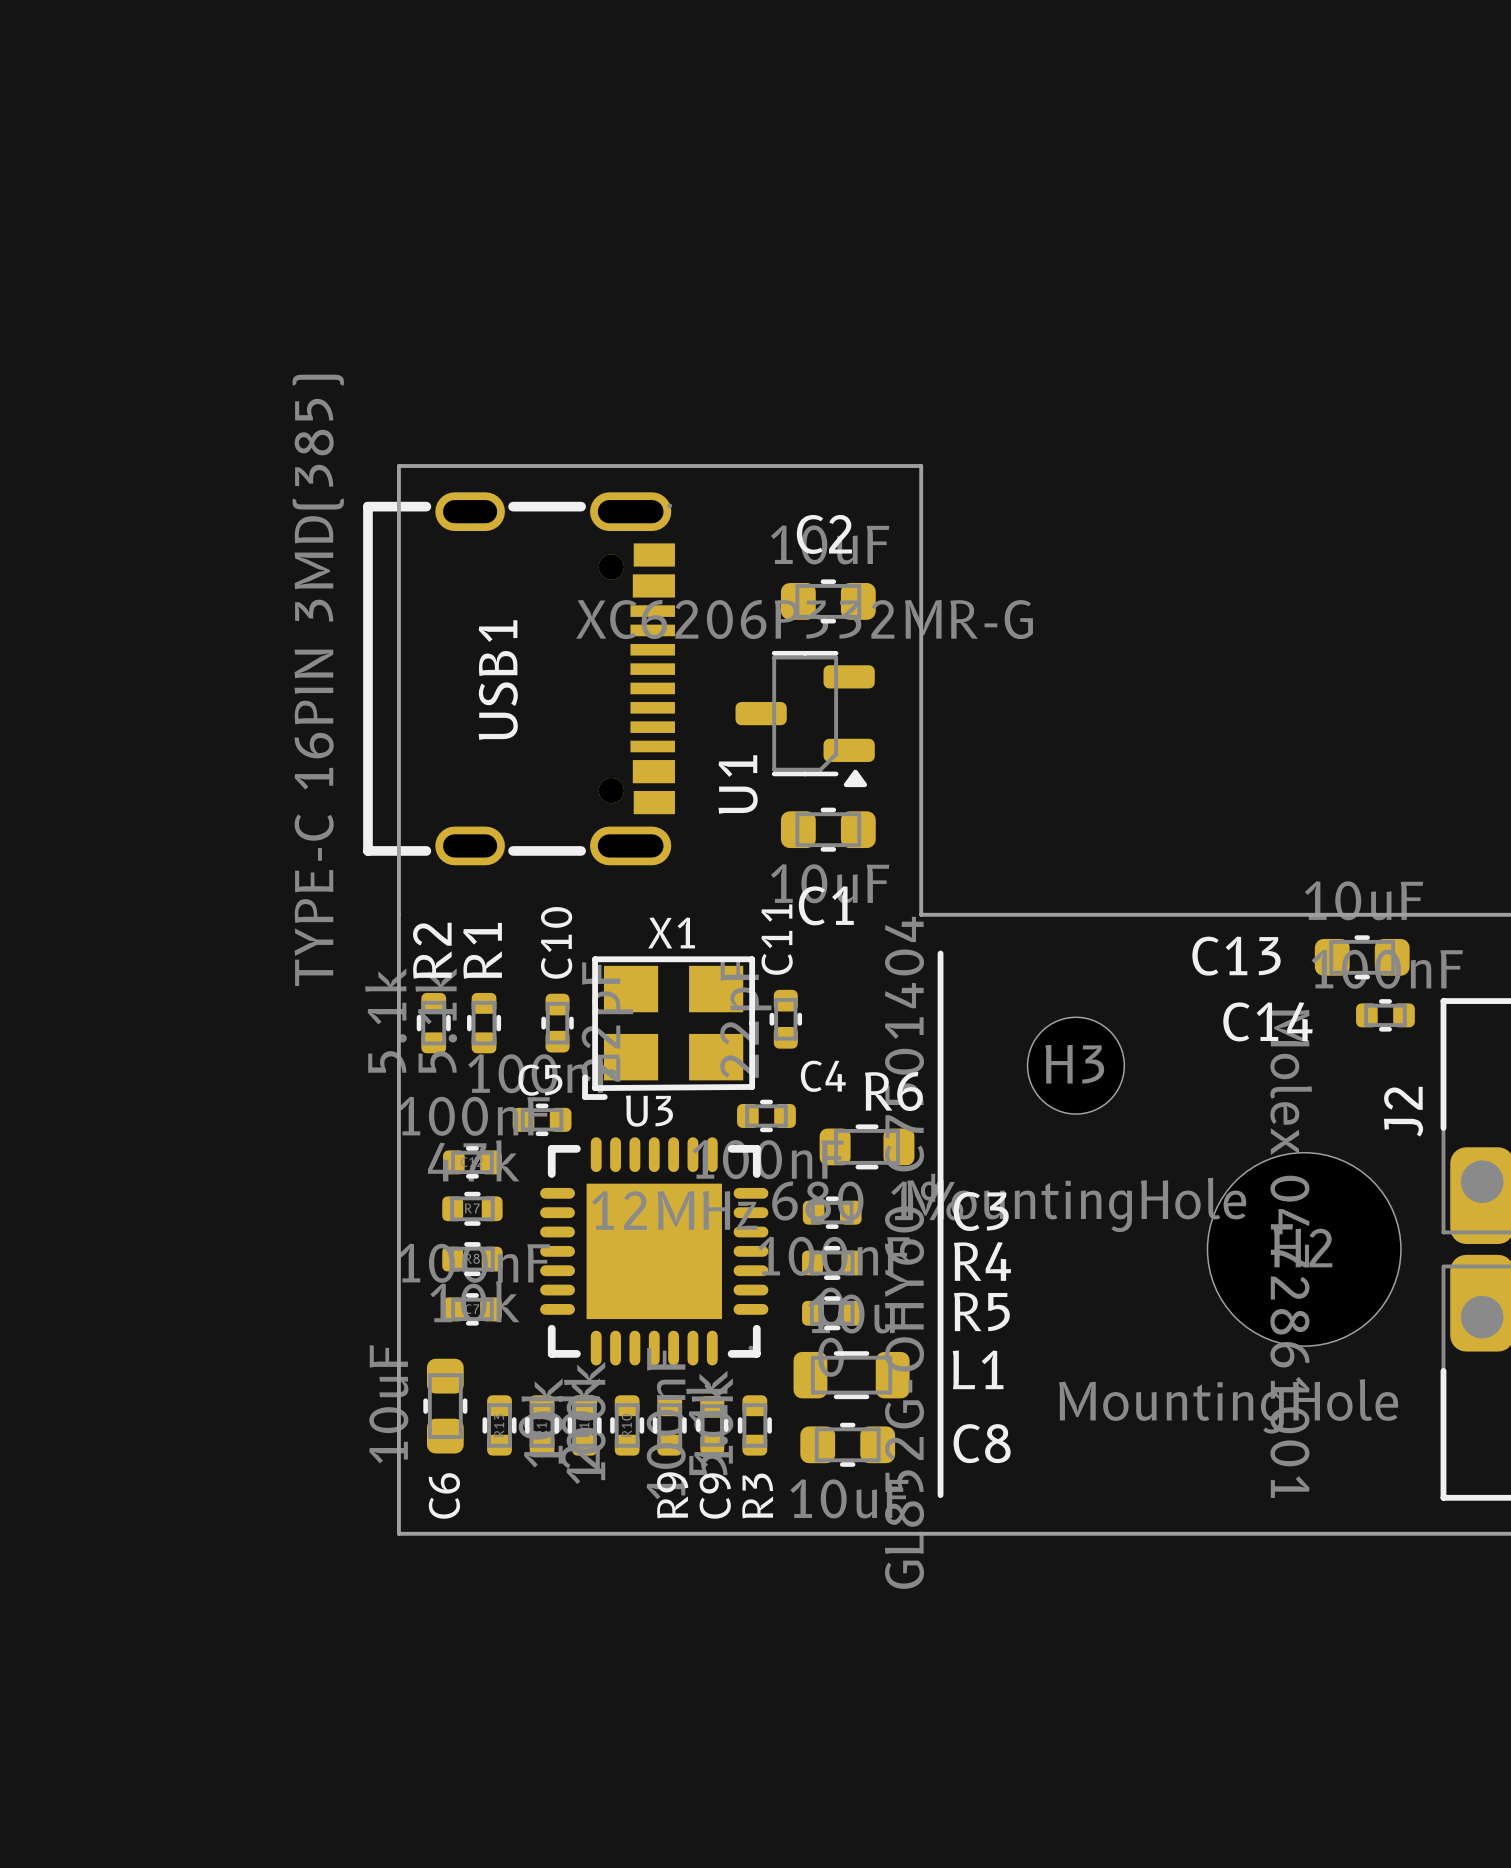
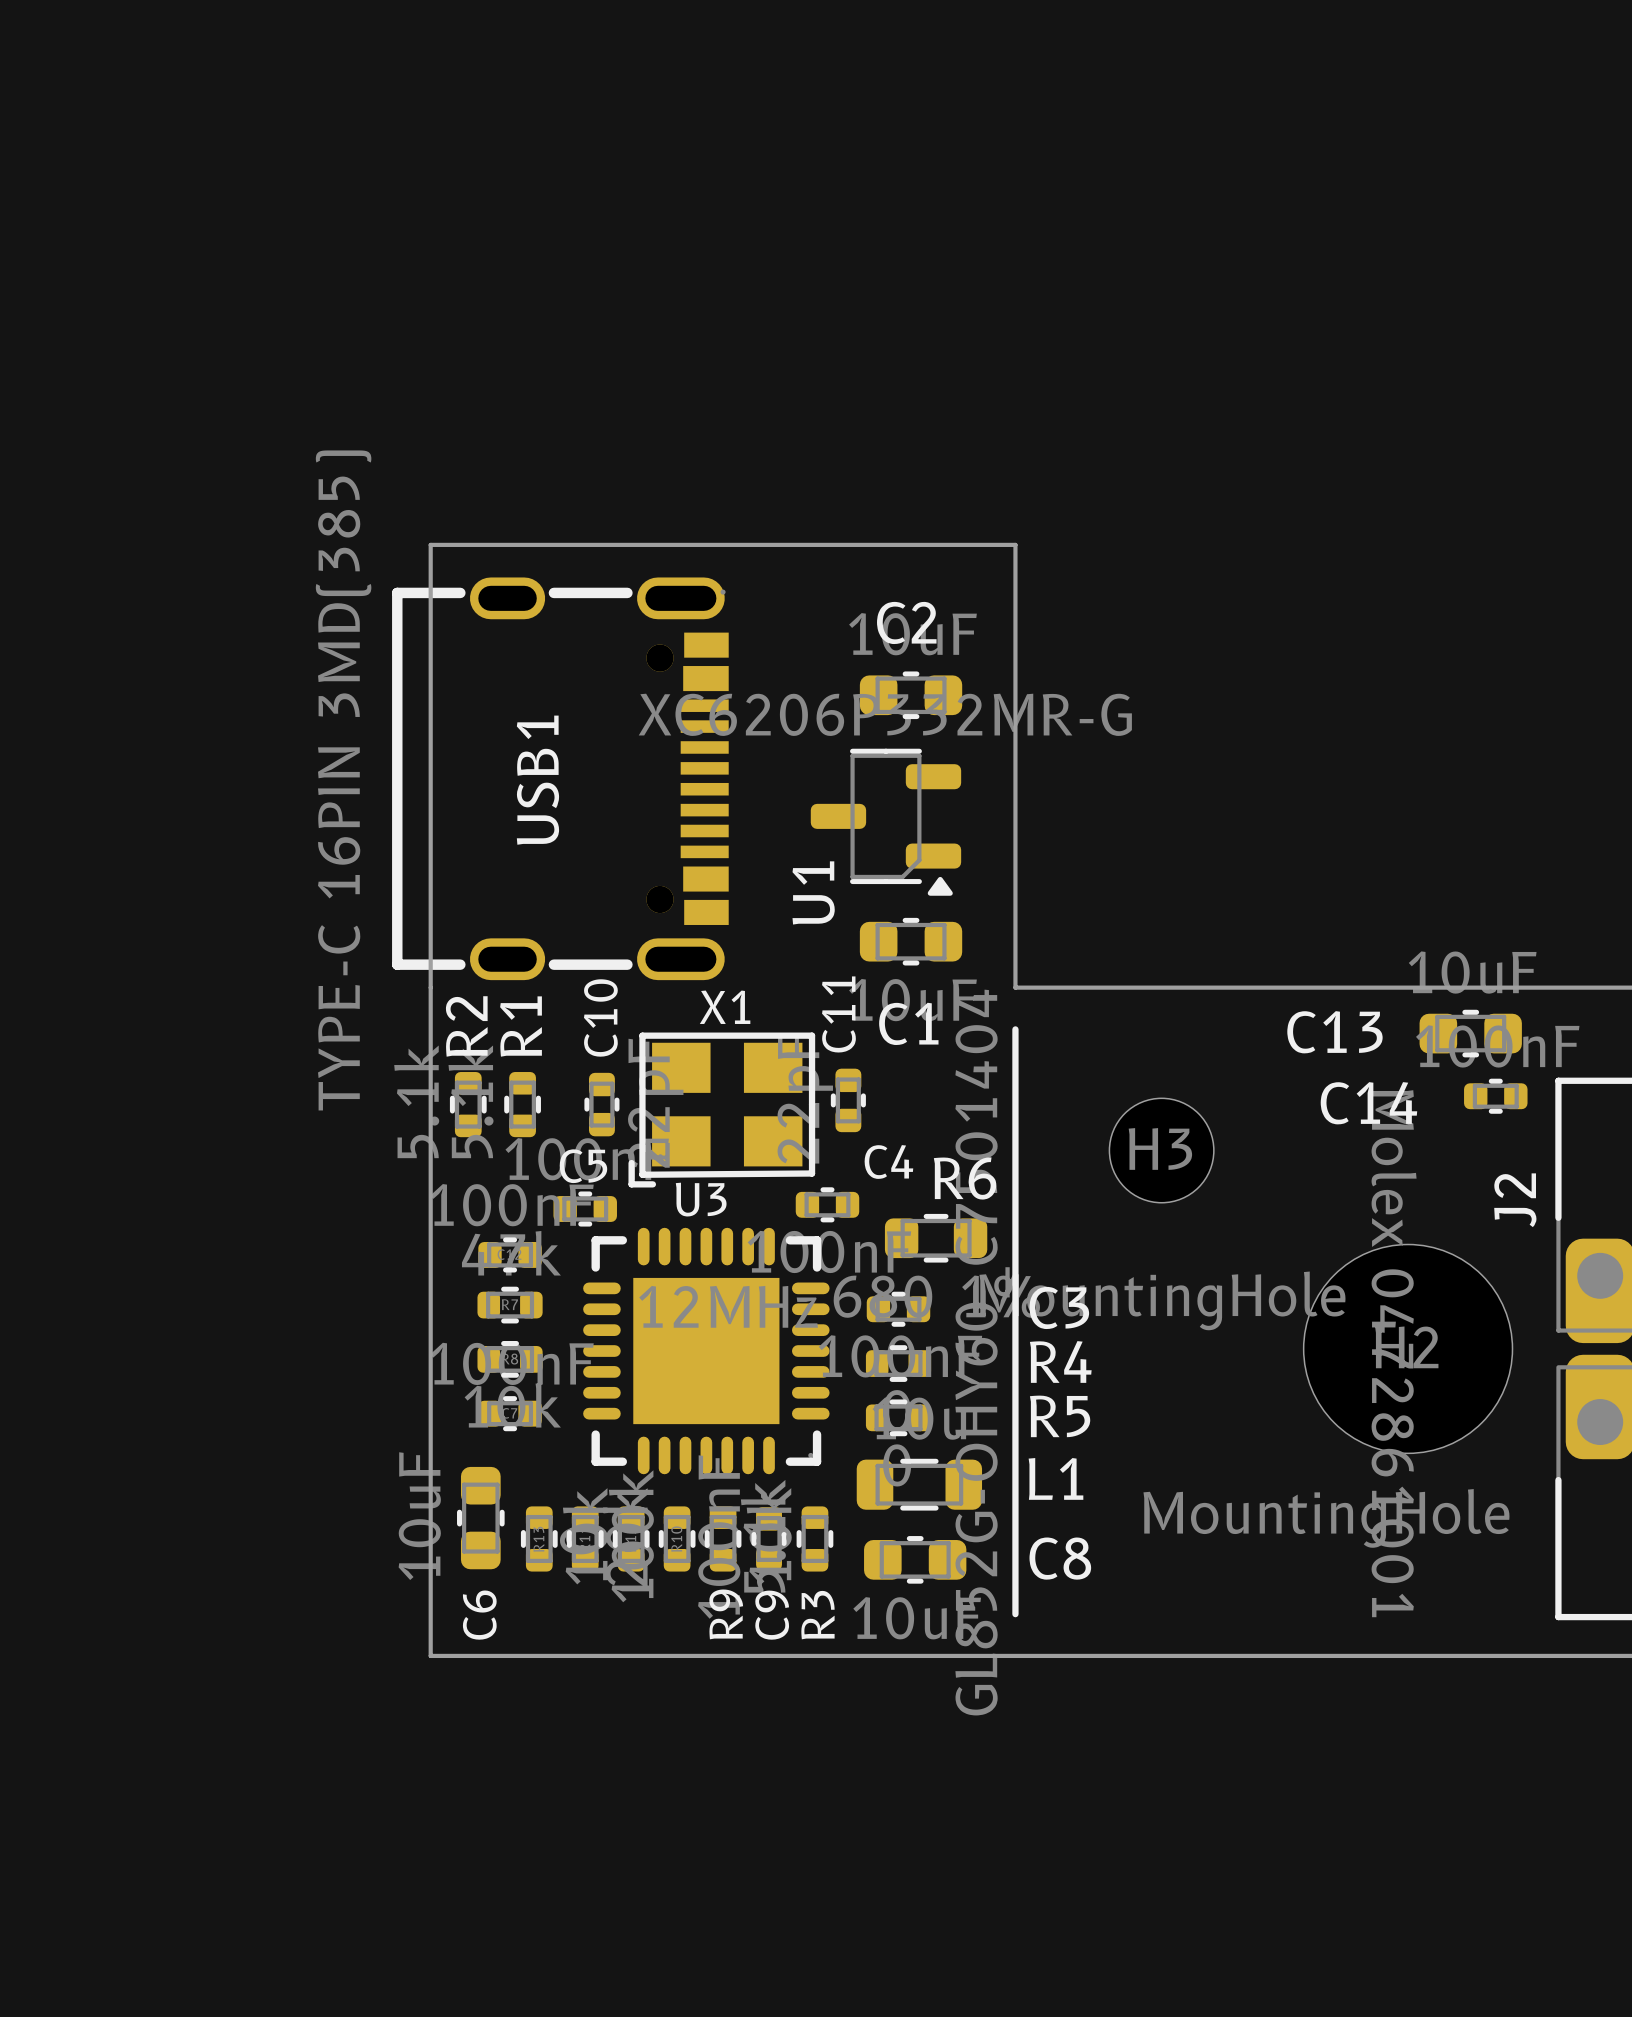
board edge: (398, 504) (398, 466) (921, 466) (921, 914) (940, 914) -> (430, 544) (1015, 544) (1015, 987)
C2 position: (828, 601) -> (911, 695)
USB1 position: (519, 678) -> (560, 778)
U1 position: (805, 719) -> (885, 822)
C1 position: (828, 829) -> (911, 941)

